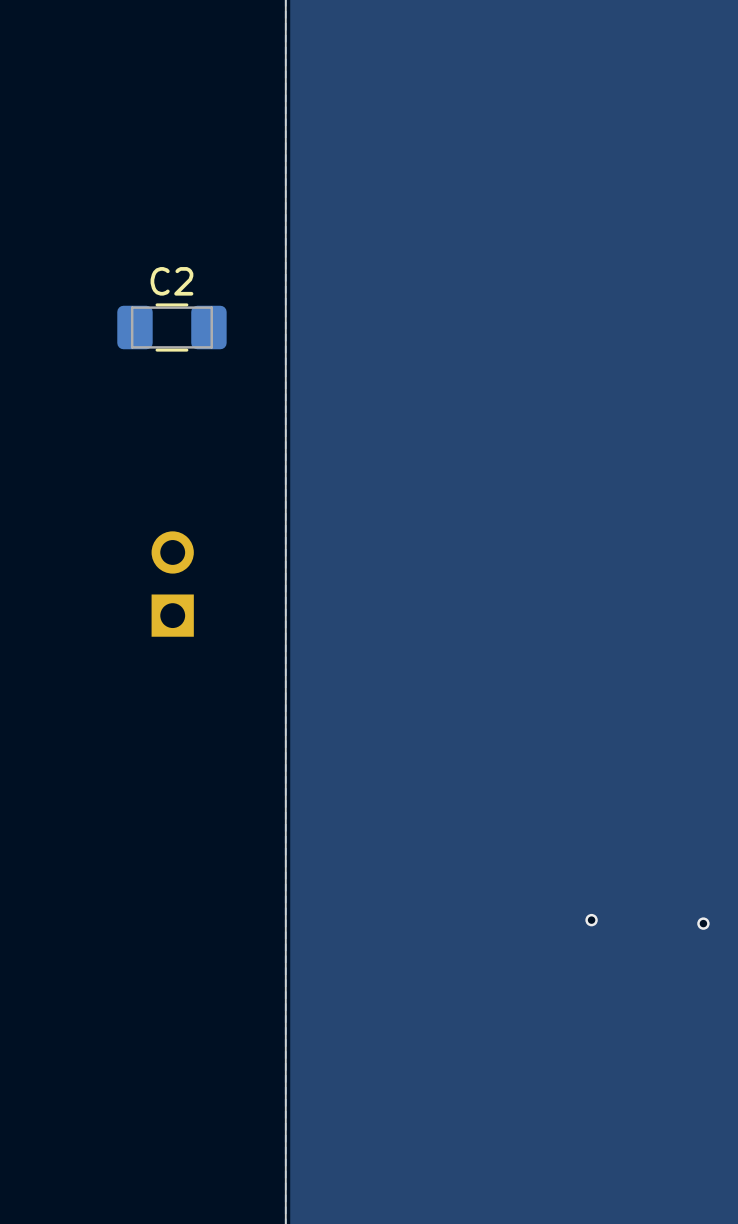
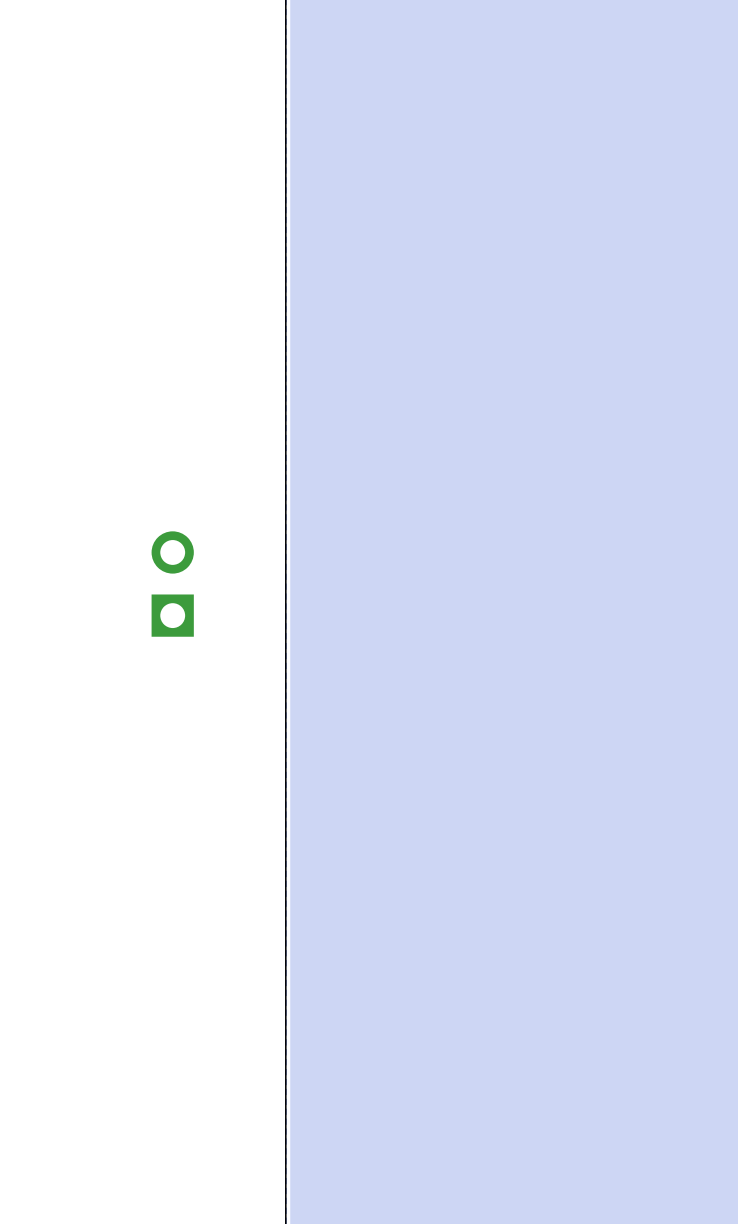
C2: (171, 327) -> none
via: (591, 920) -> none
via: (703, 923) -> none

